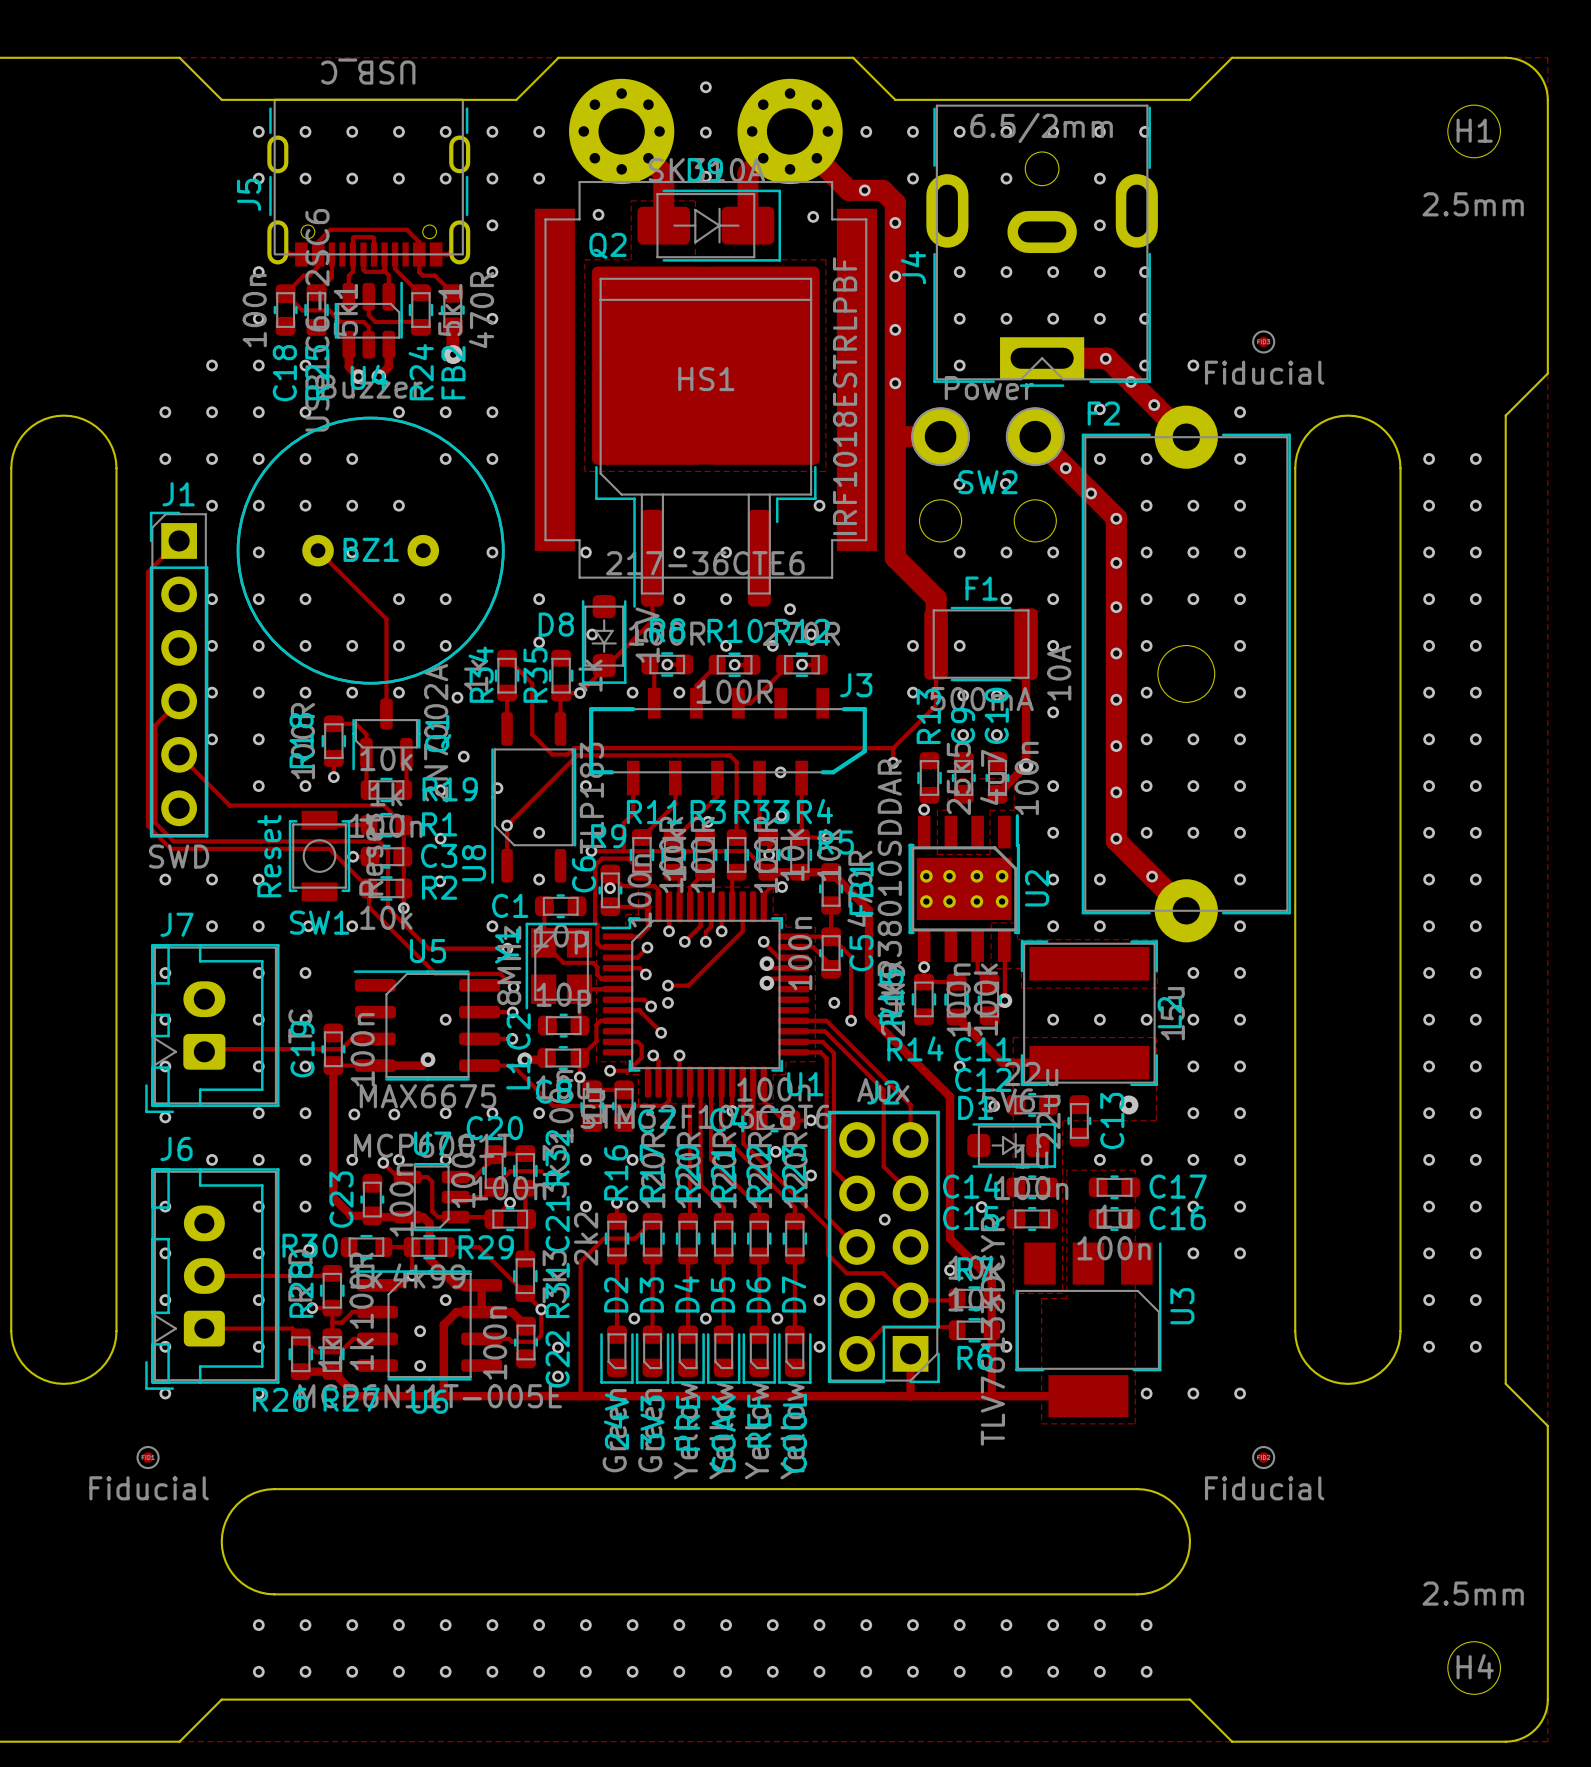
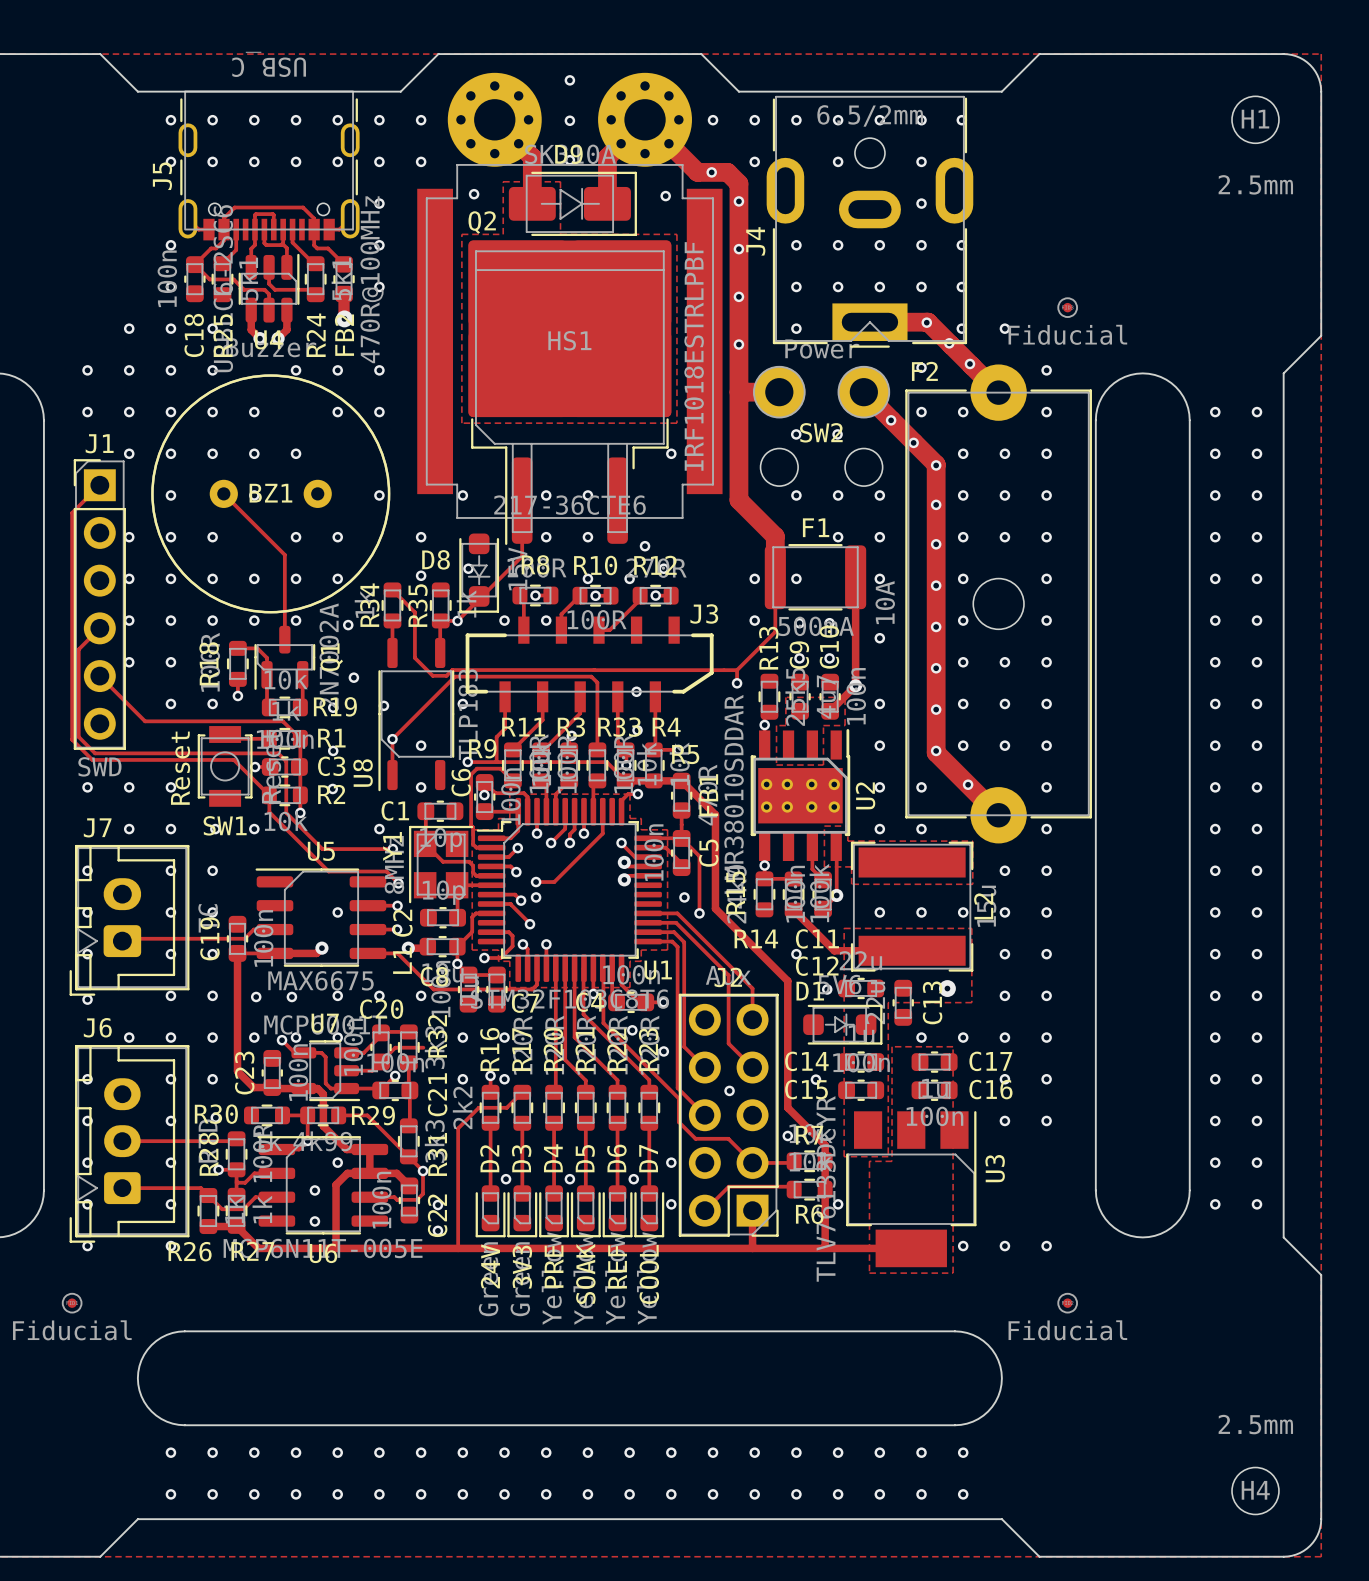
FB2 value: 470R (481, 310) -> 470R@100MHz (372, 279)

